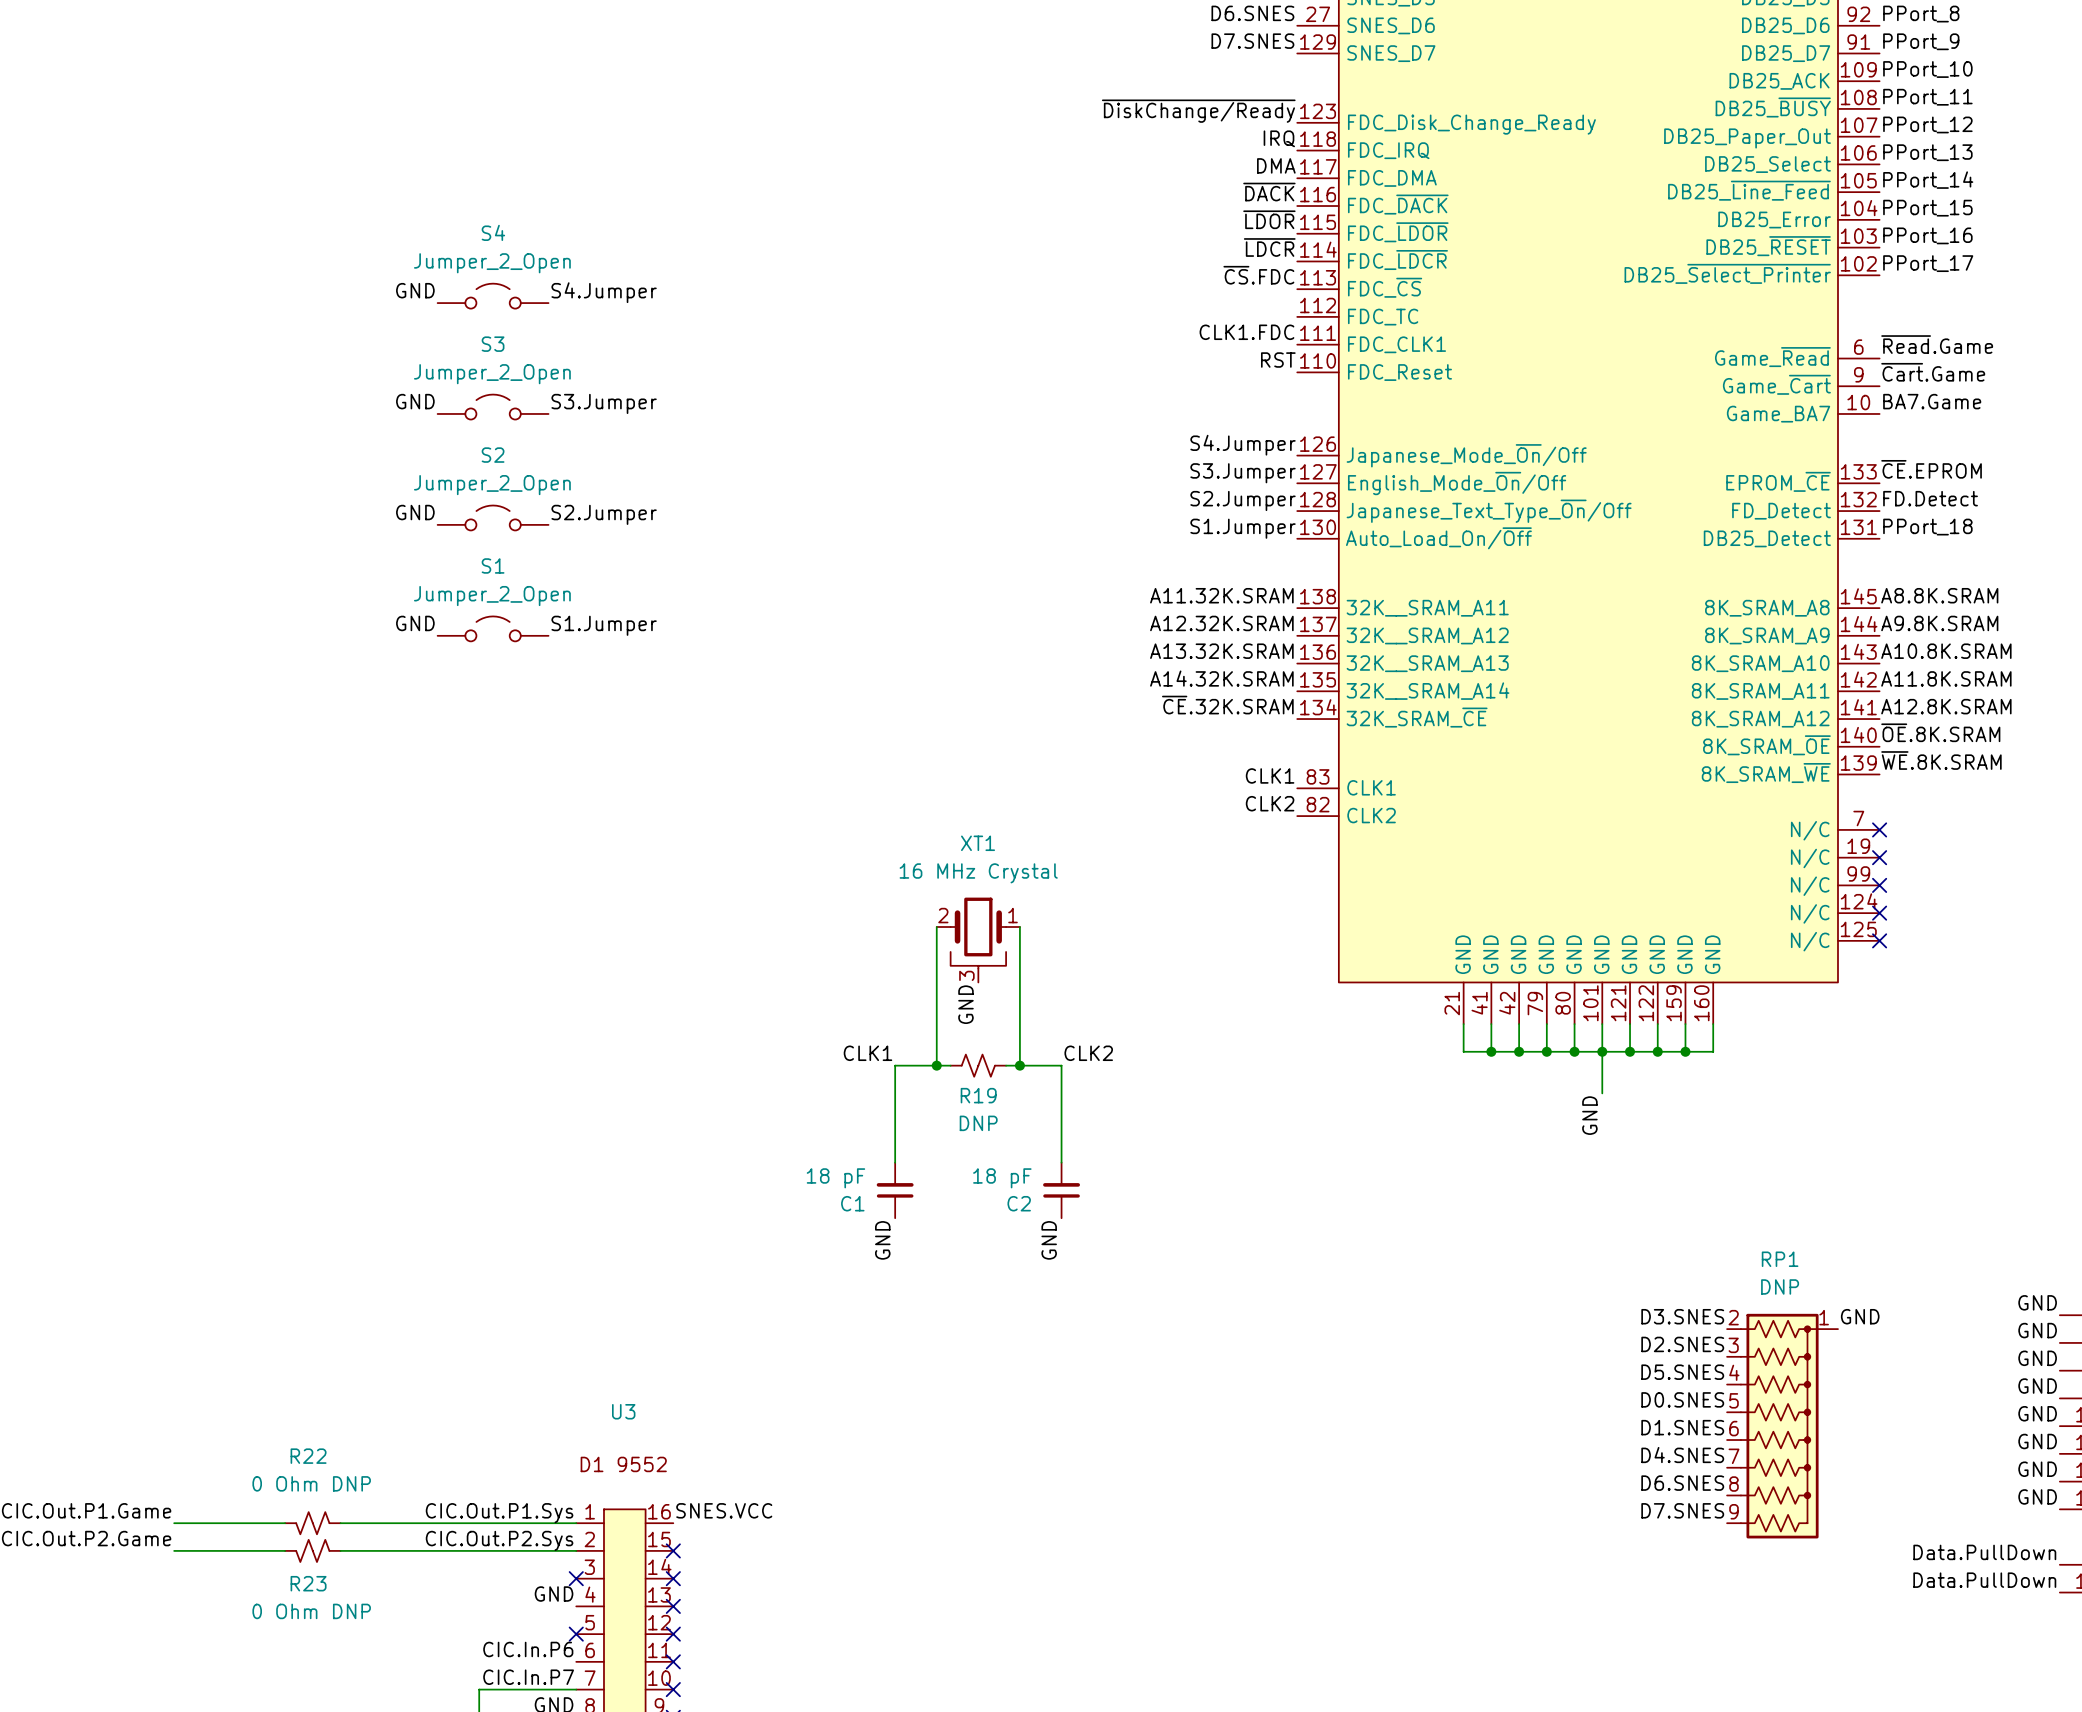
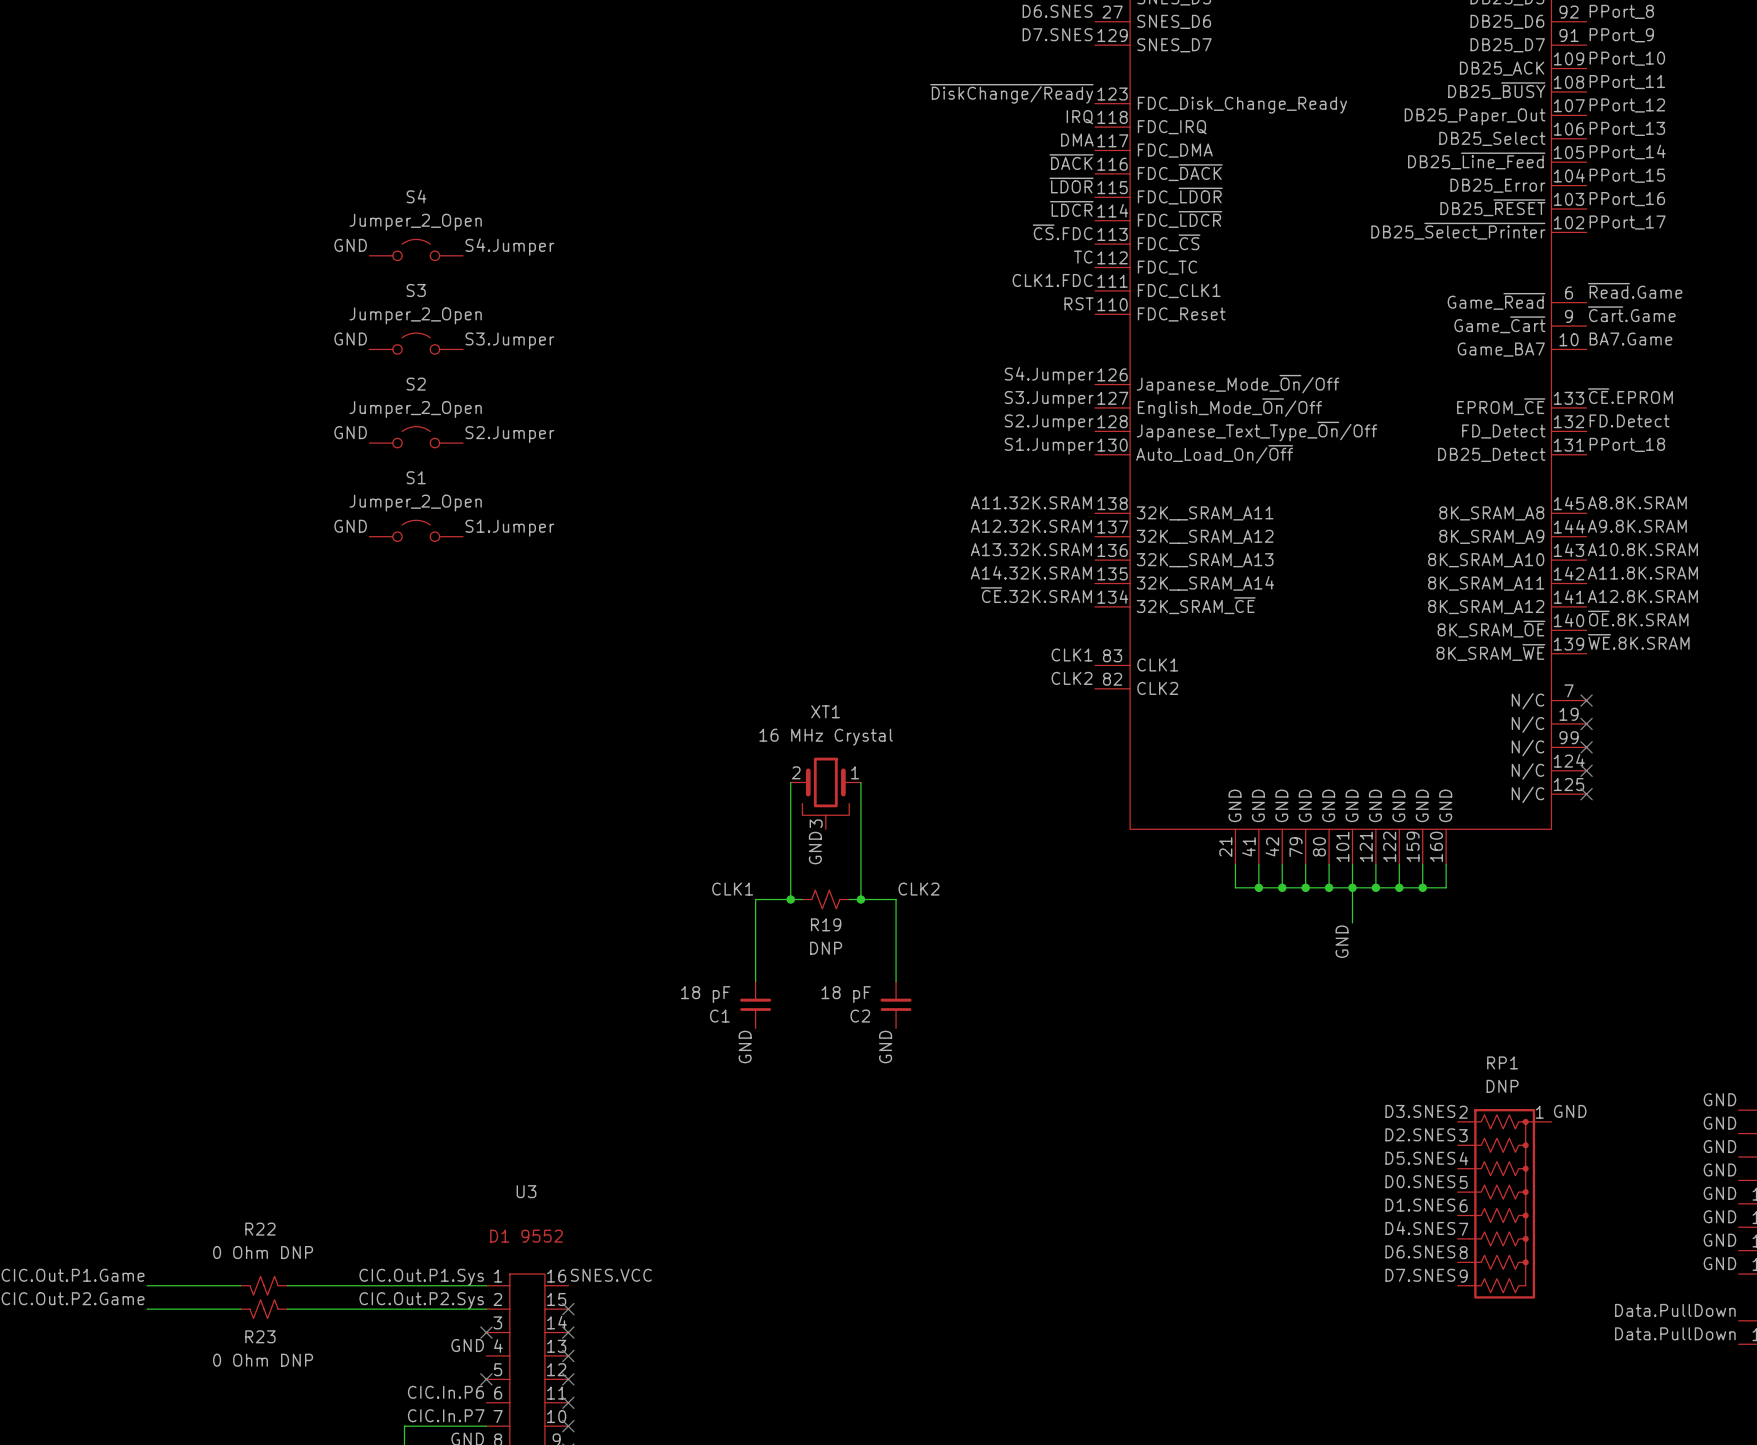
label: none -> TC (1083, 257)

